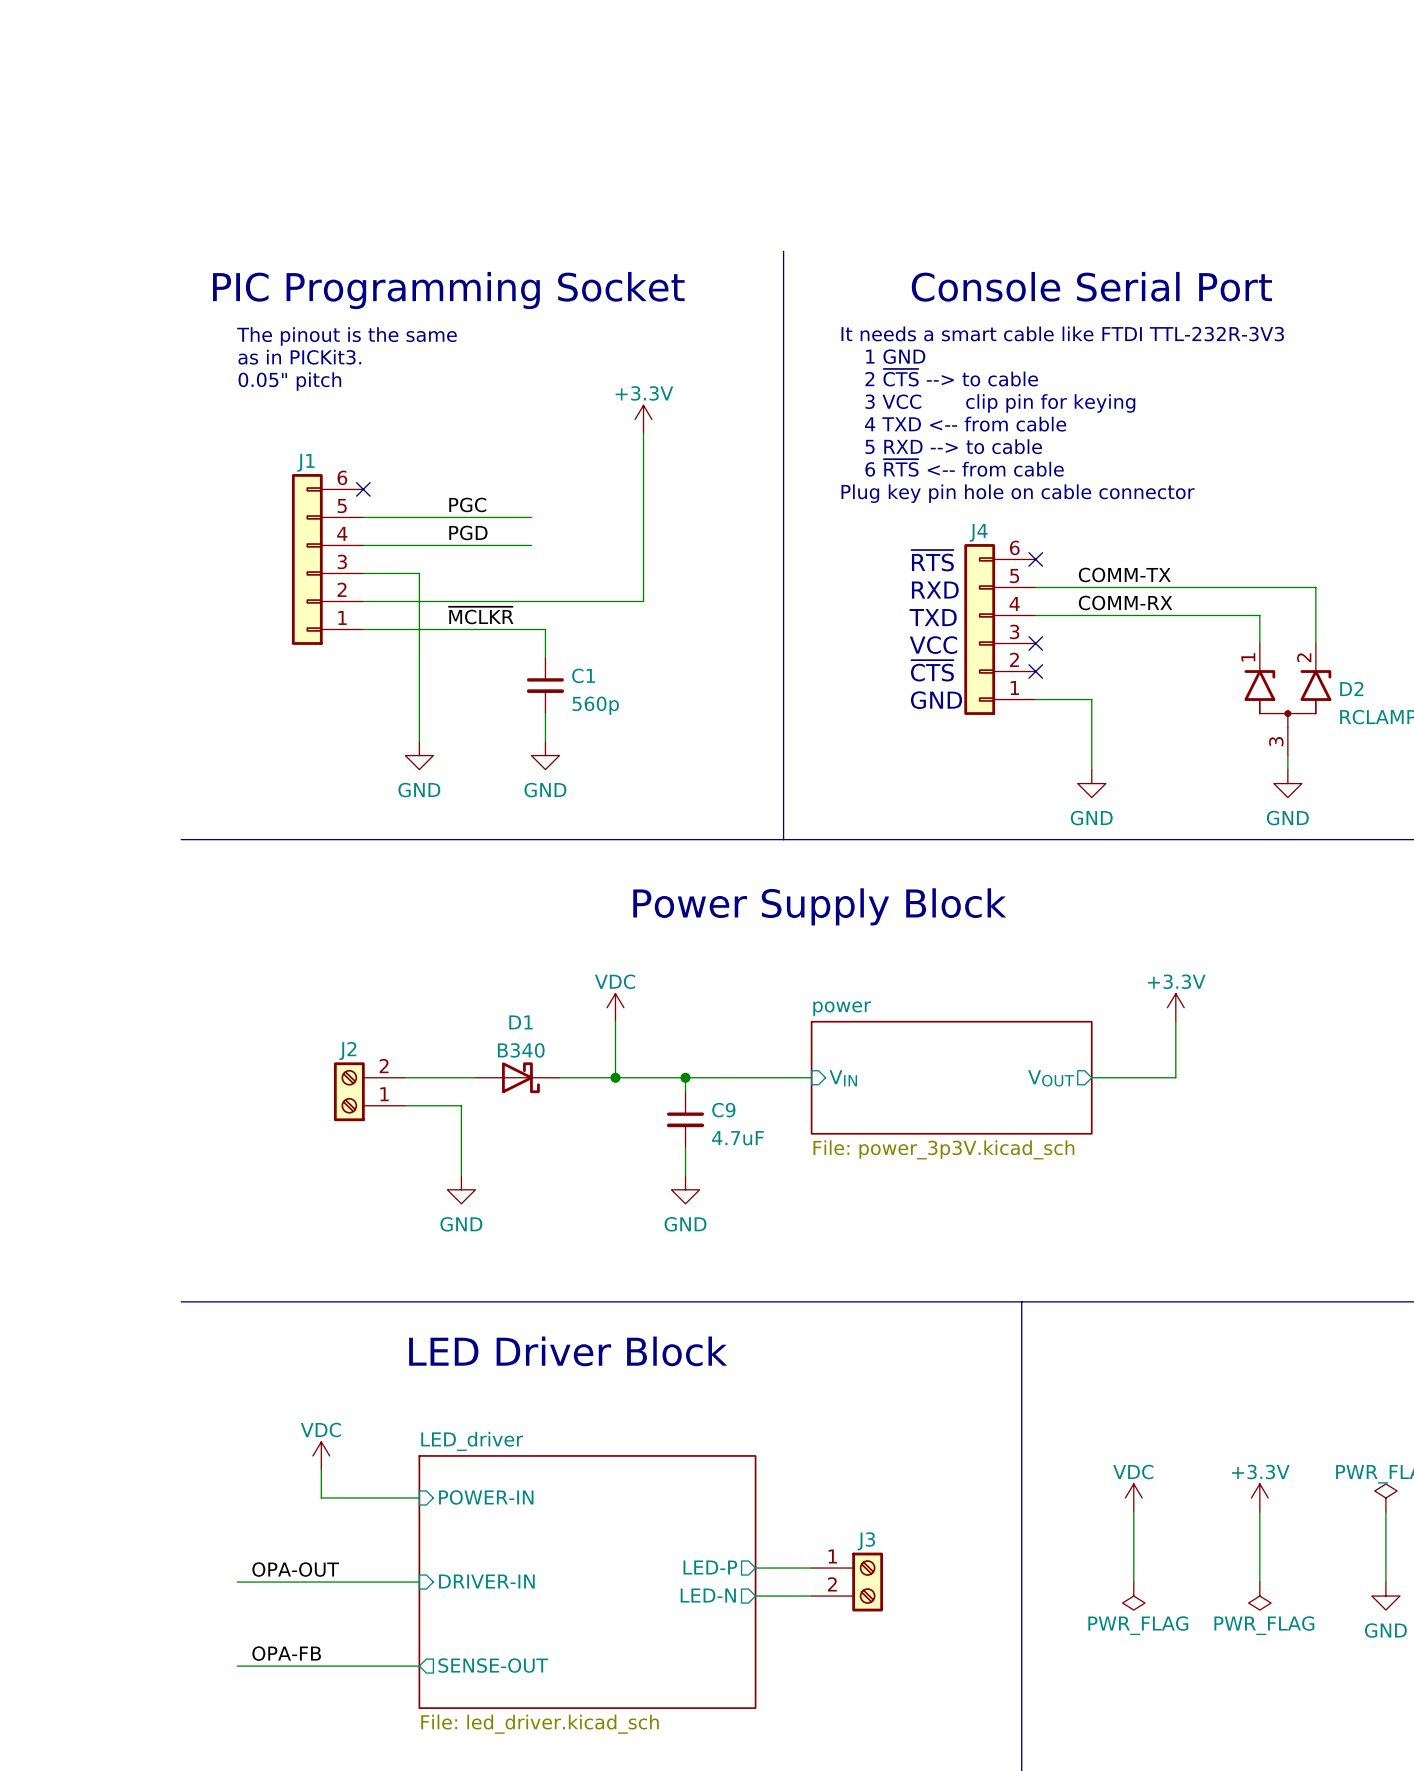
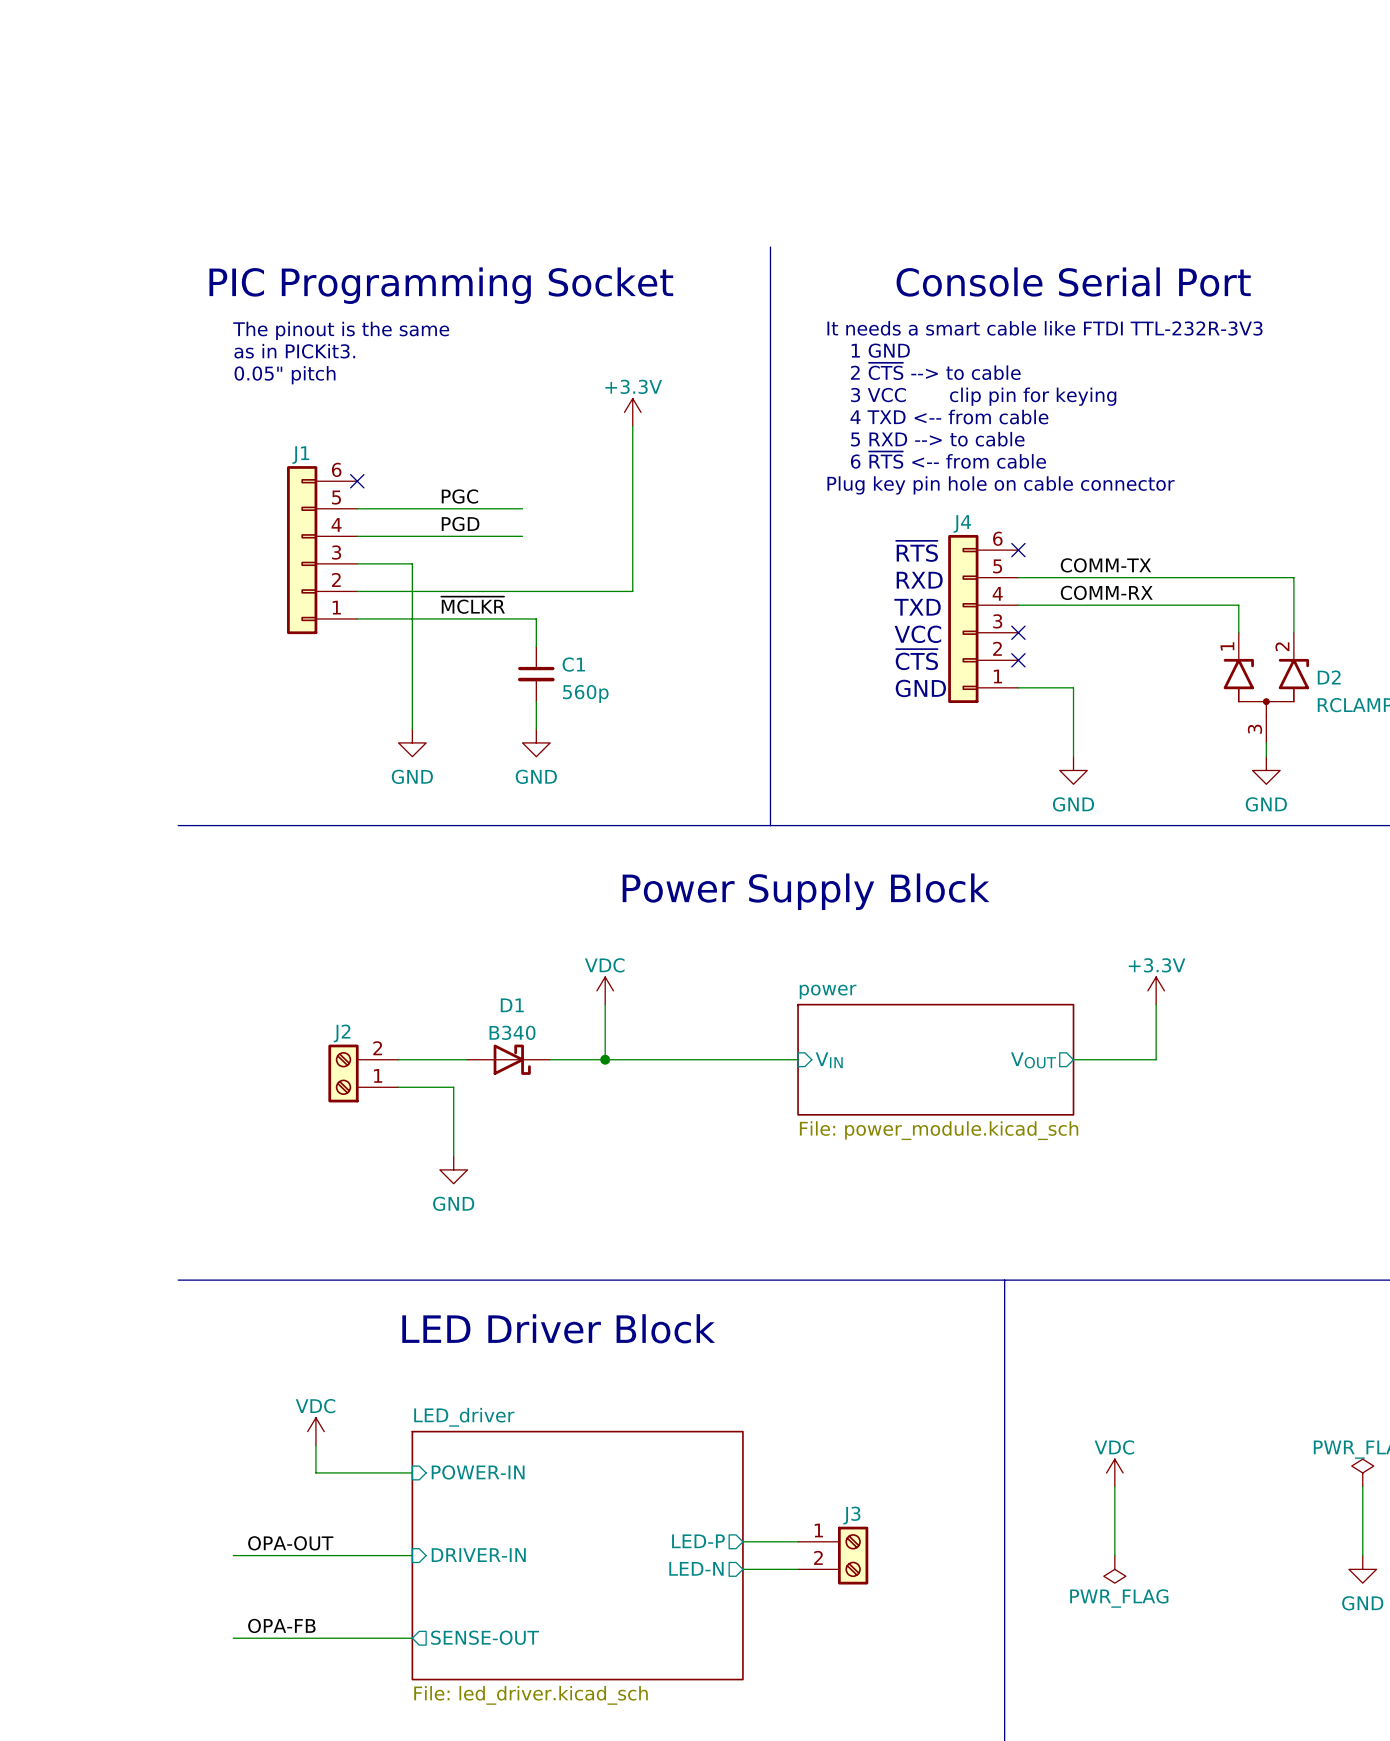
wire: (685, 1077) (685, 1091) -> none
junction: (685, 1077) -> none
C9: 4.7uF (685, 1119) -> none
wire: (685, 1147) (685, 1175) -> none
sheet power value: File: power_3p3V.kicad_sch (943, 1149) -> File: power_module.kicad_sch (939, 1130)
power symbol: GND (685, 1189) -> none
power symbol: +3.3V (1259, 1497) -> none
wire: (1259, 1511) (1259, 1582) -> none
power symbol: PWR_FLAG (1259, 1596) -> none

